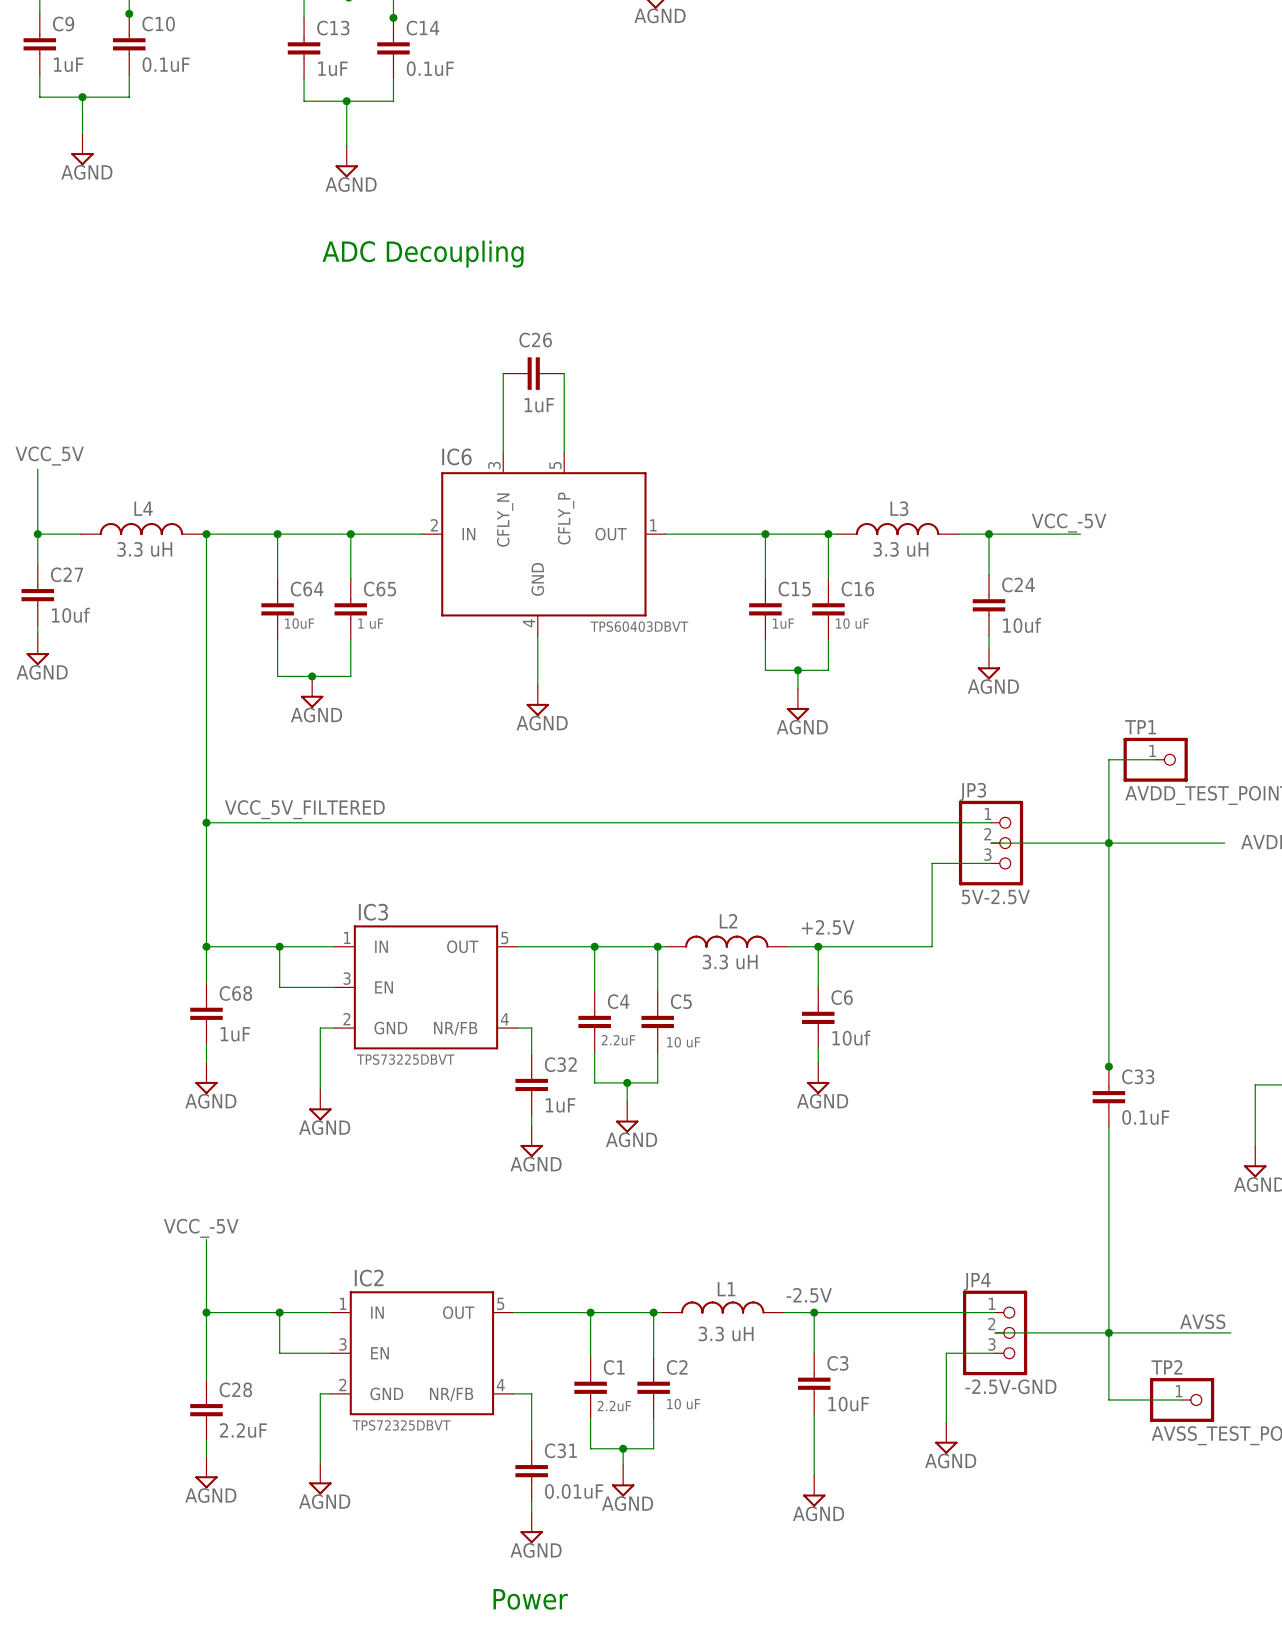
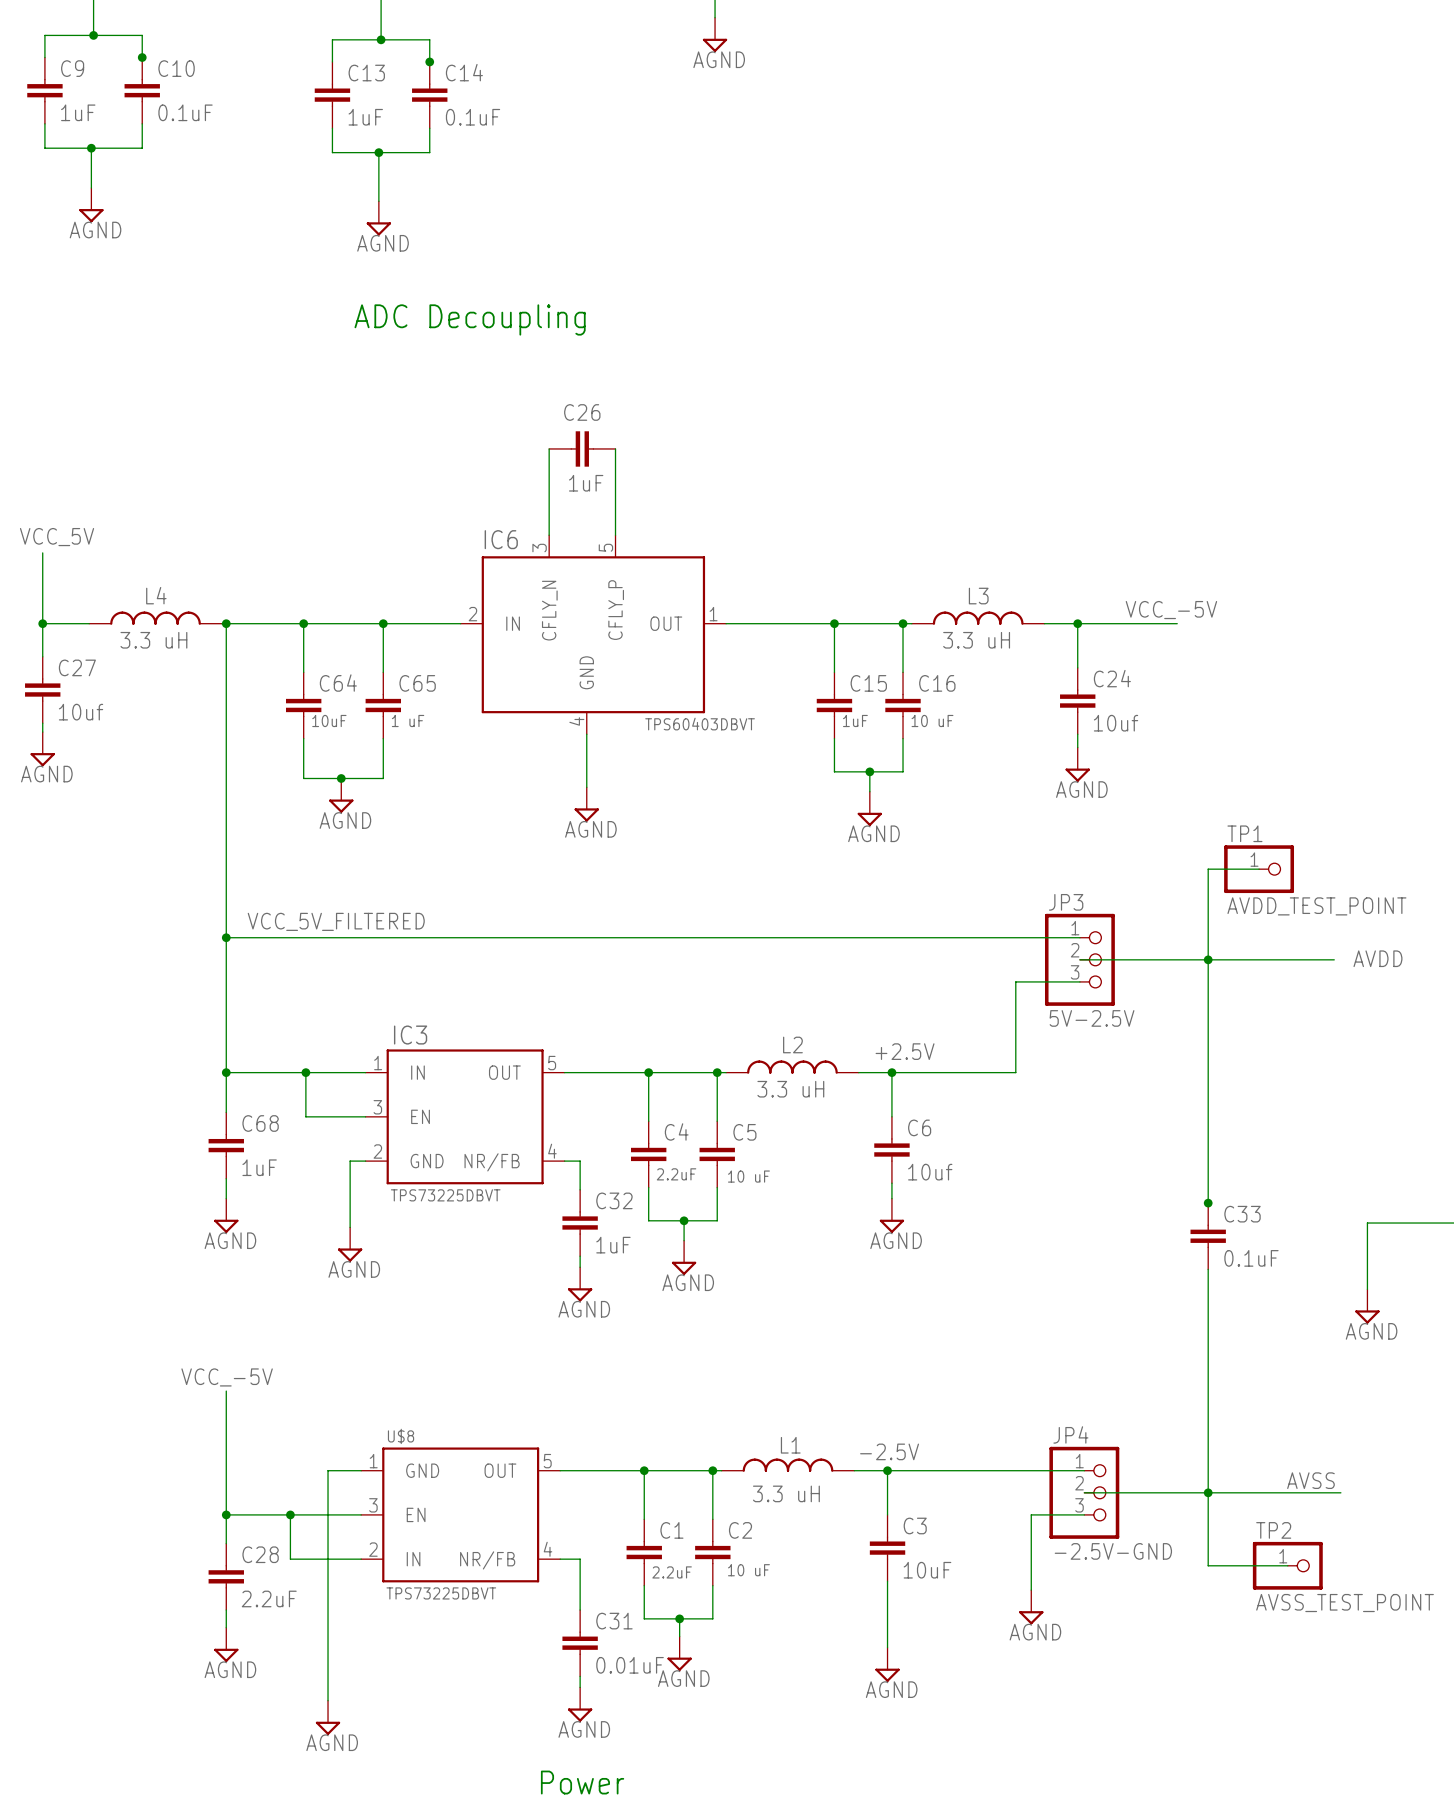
IC2 name: IC2 (369, 1278) -> U$8 (401, 1436)
wire: (206, 1312) (299, 1312) -> (328, 1700) (328, 1470)
junction: (206, 1312) -> none
wire: (279, 1312) (279, 1353) -> (226, 1514) (305, 1514)
junction: (279, 1312) -> none
IC2 pin name: IN (377, 1312) -> GND (422, 1470)
junction: none -> (226, 1514)
junction: none -> (290, 1514)
wire: (320, 1393) (320, 1463) -> (350, 1559) (290, 1559) (290, 1514)
IC2 pin name: GND (386, 1393) -> IN (413, 1559)
IC2 value: TPS72325DBVT (401, 1425) -> TPS73225DBVT (441, 1593)
power symbol position: AGND (320, 1478) -> AGND (328, 1717)

